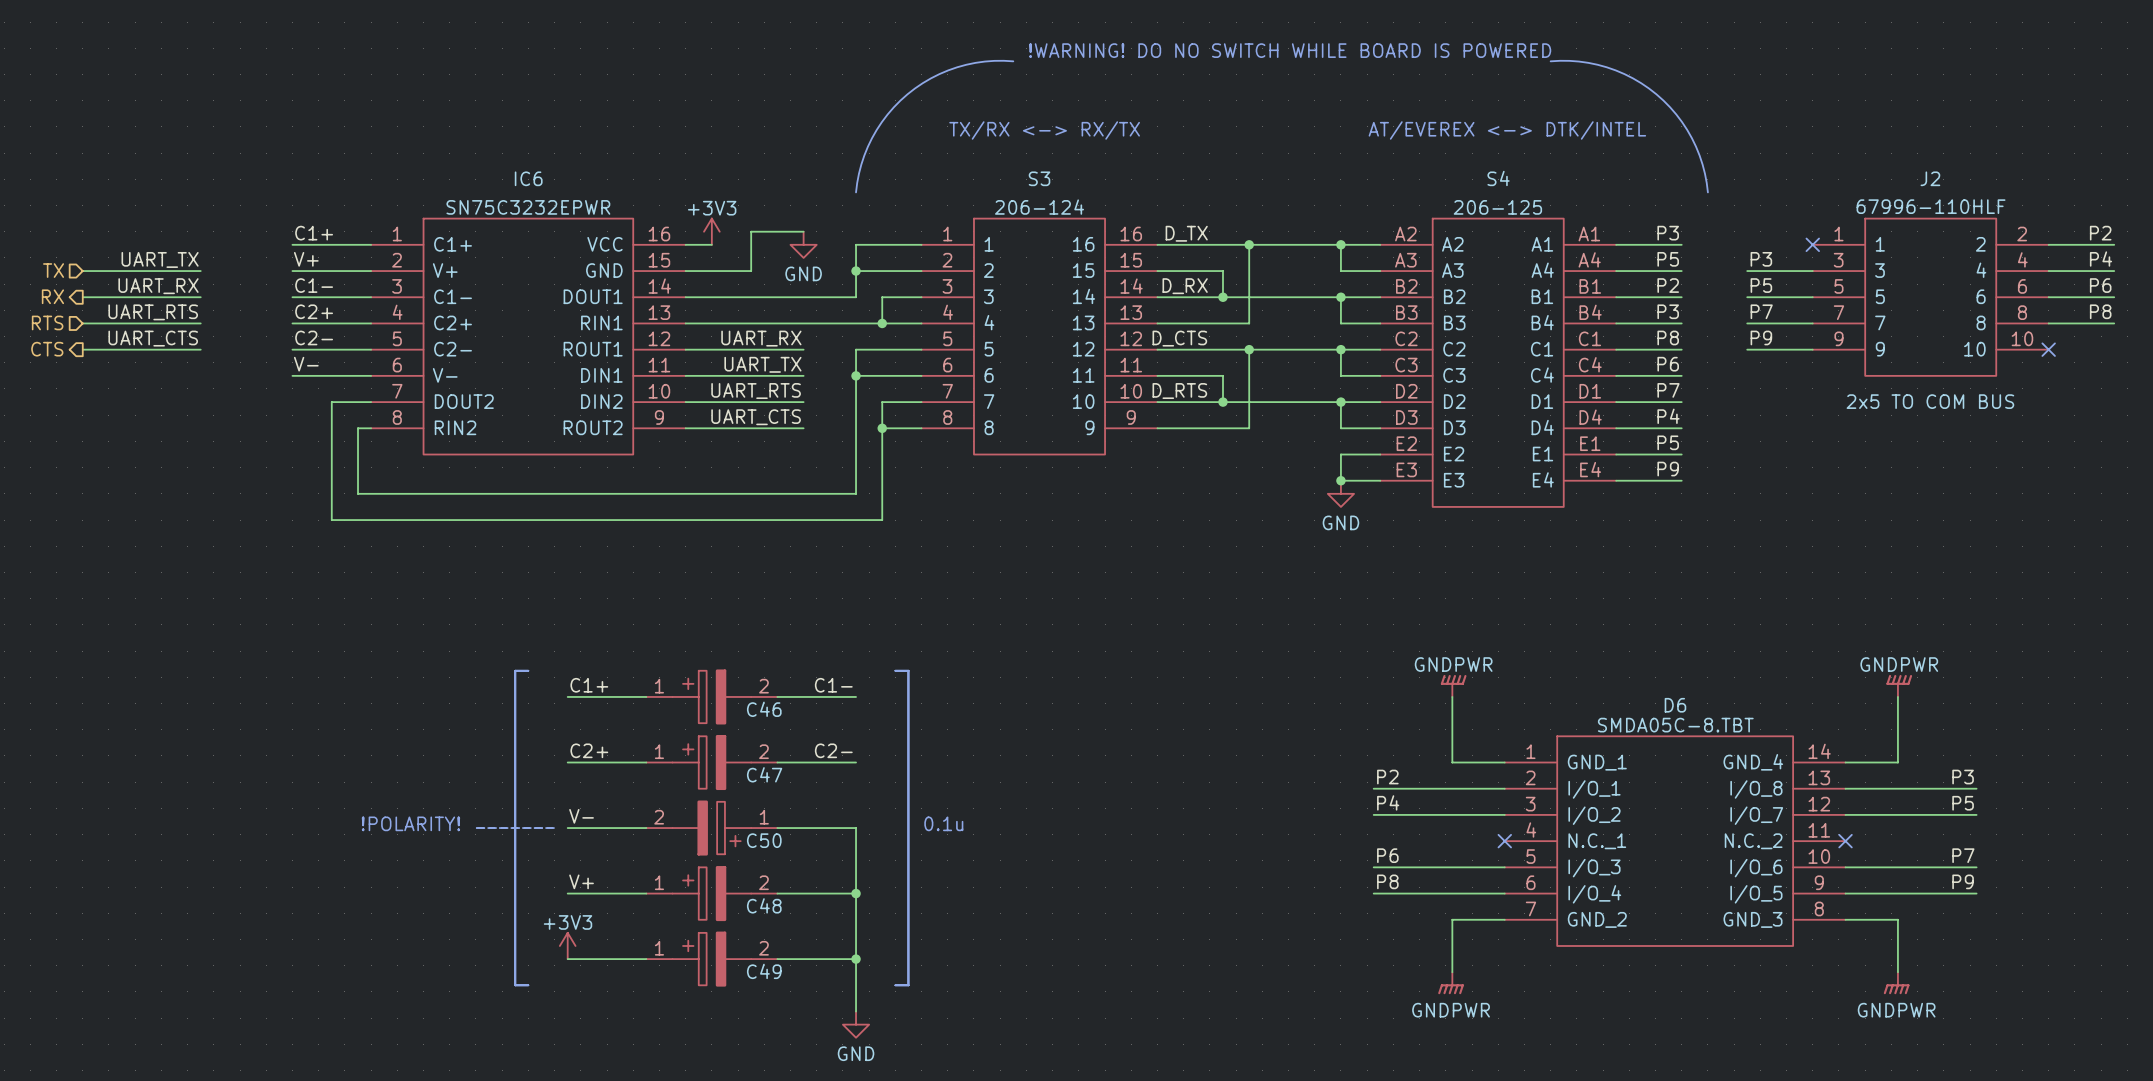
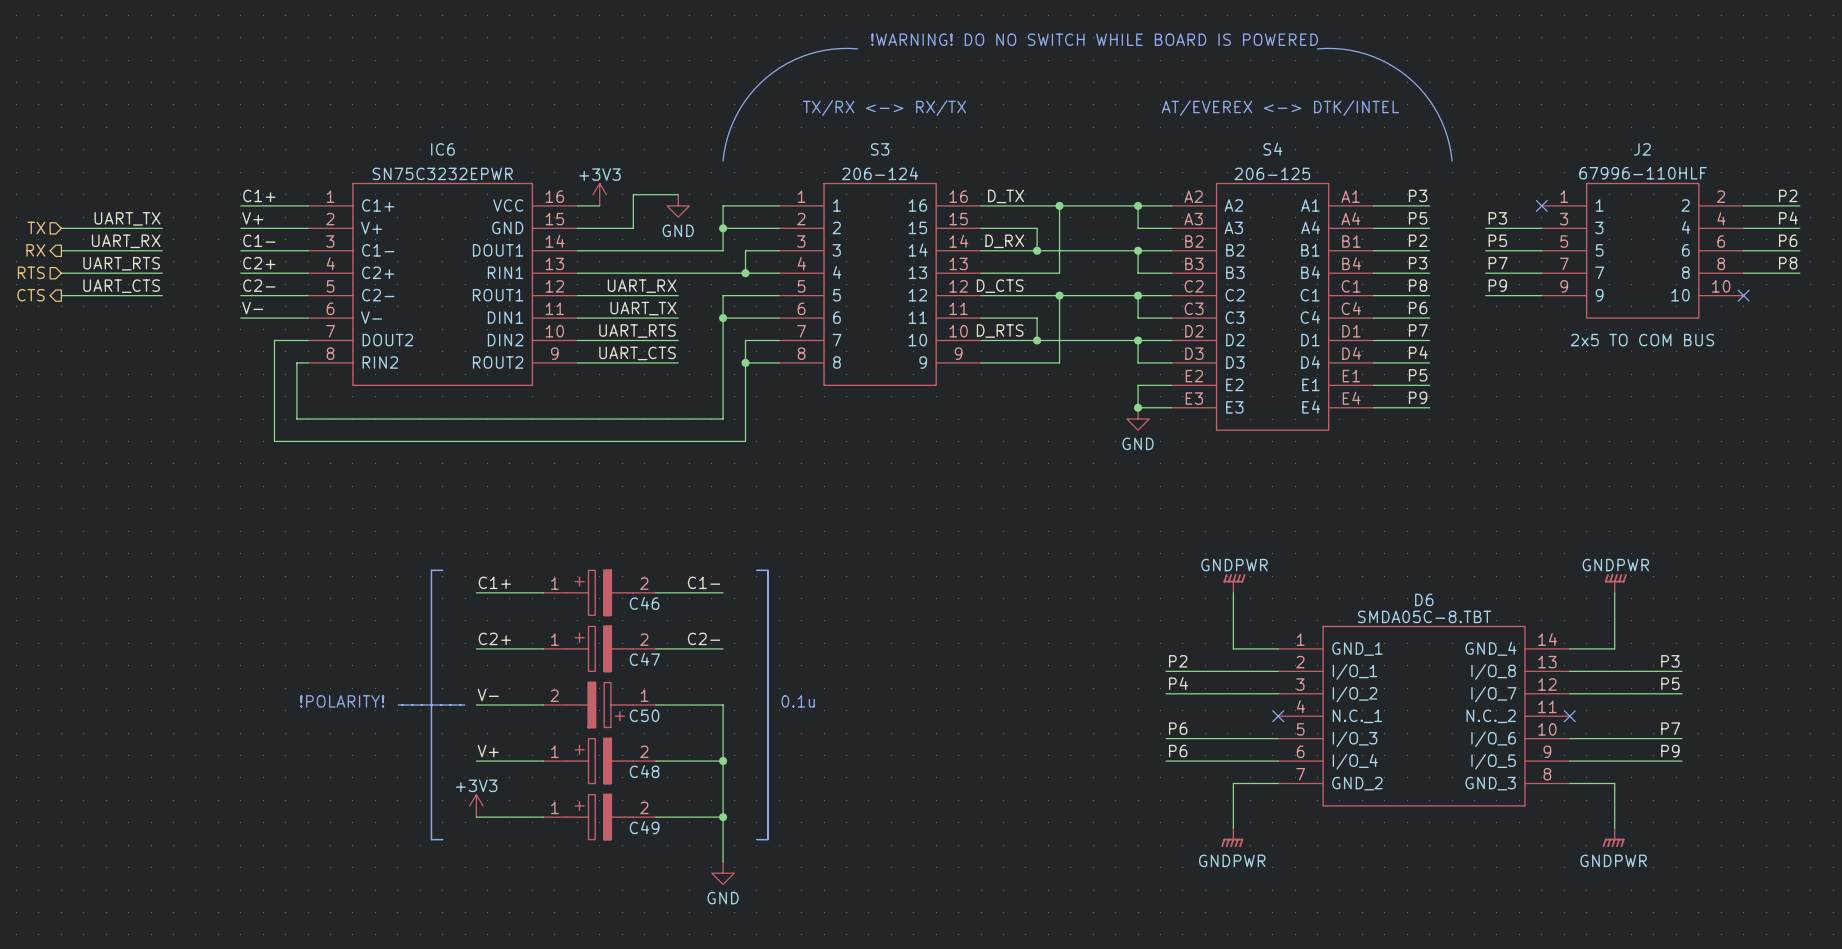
label: P8 (1387, 881) -> P6 (1178, 751)

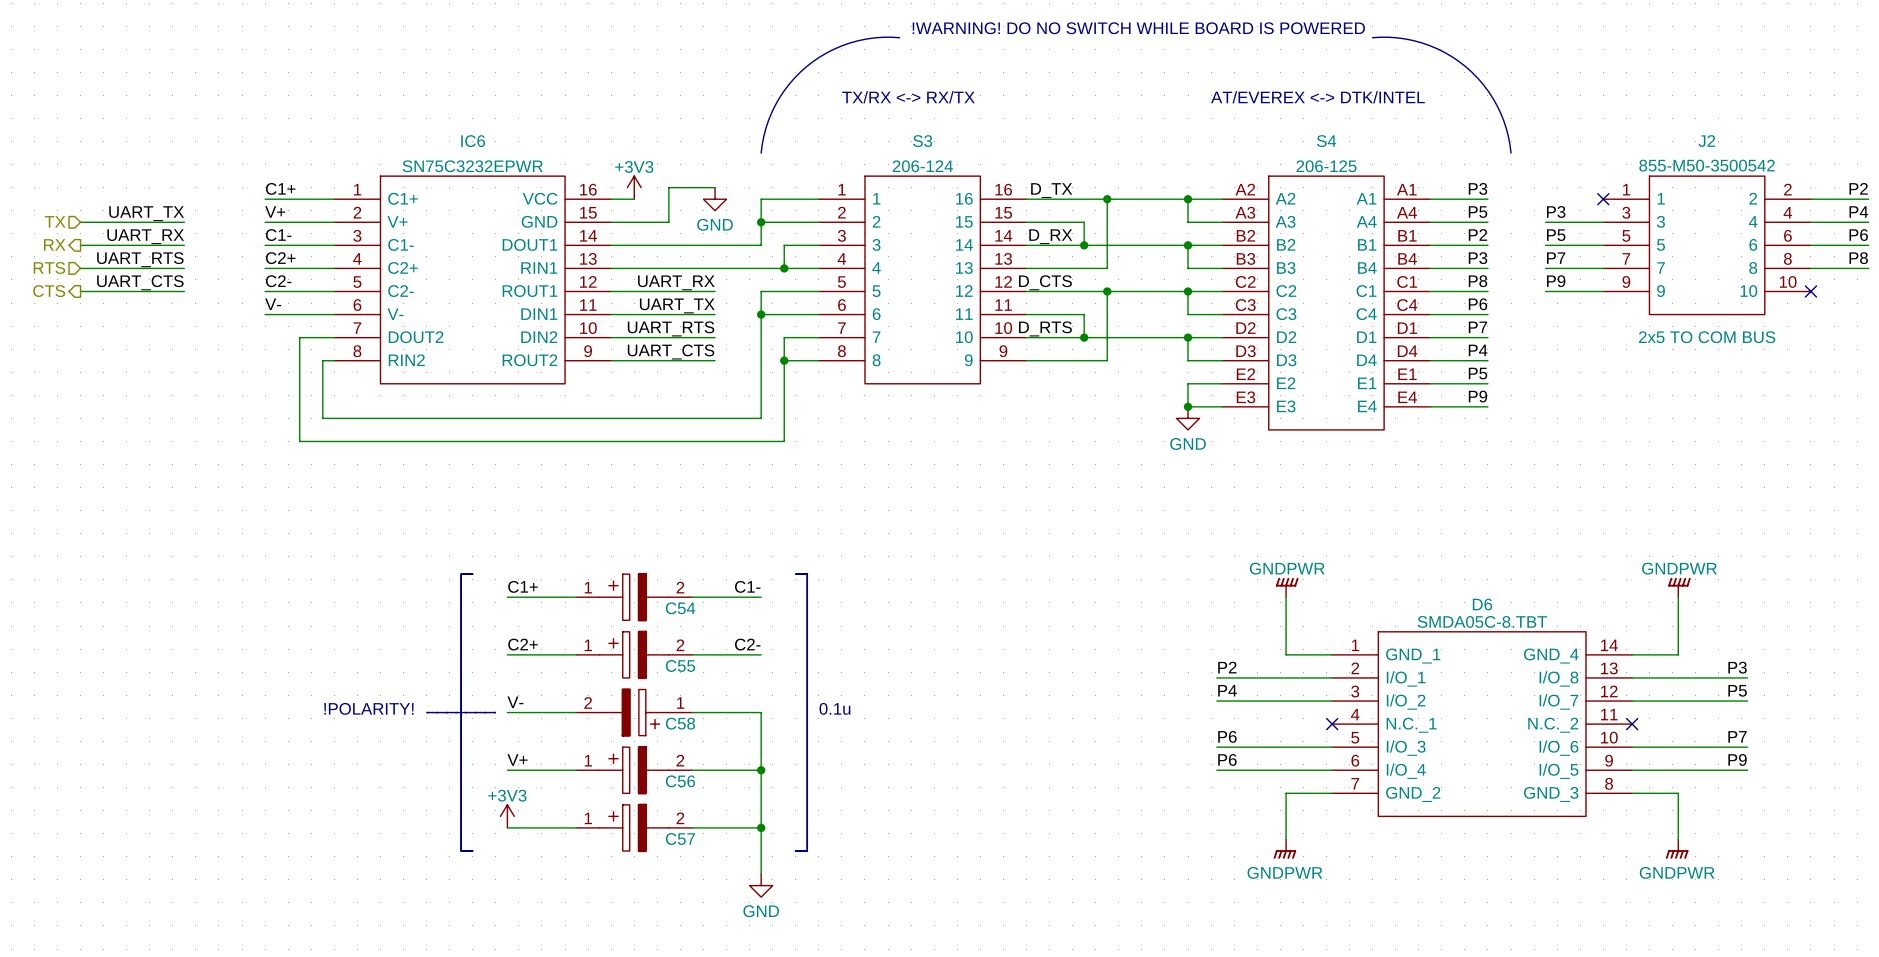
J2 value: 67996-110HLF (1643, 173) -> 855-M50-3500542 (1707, 165)
C46 name: C46 (644, 603) -> C54 (680, 608)
C47 name: C47 (644, 659) -> C55 (680, 665)
C50 name: C50 (644, 715) -> C58 (680, 723)
C48 name: C48 (644, 771) -> C56 (680, 781)
C49 name: C49 (644, 827) -> C57 (680, 839)

